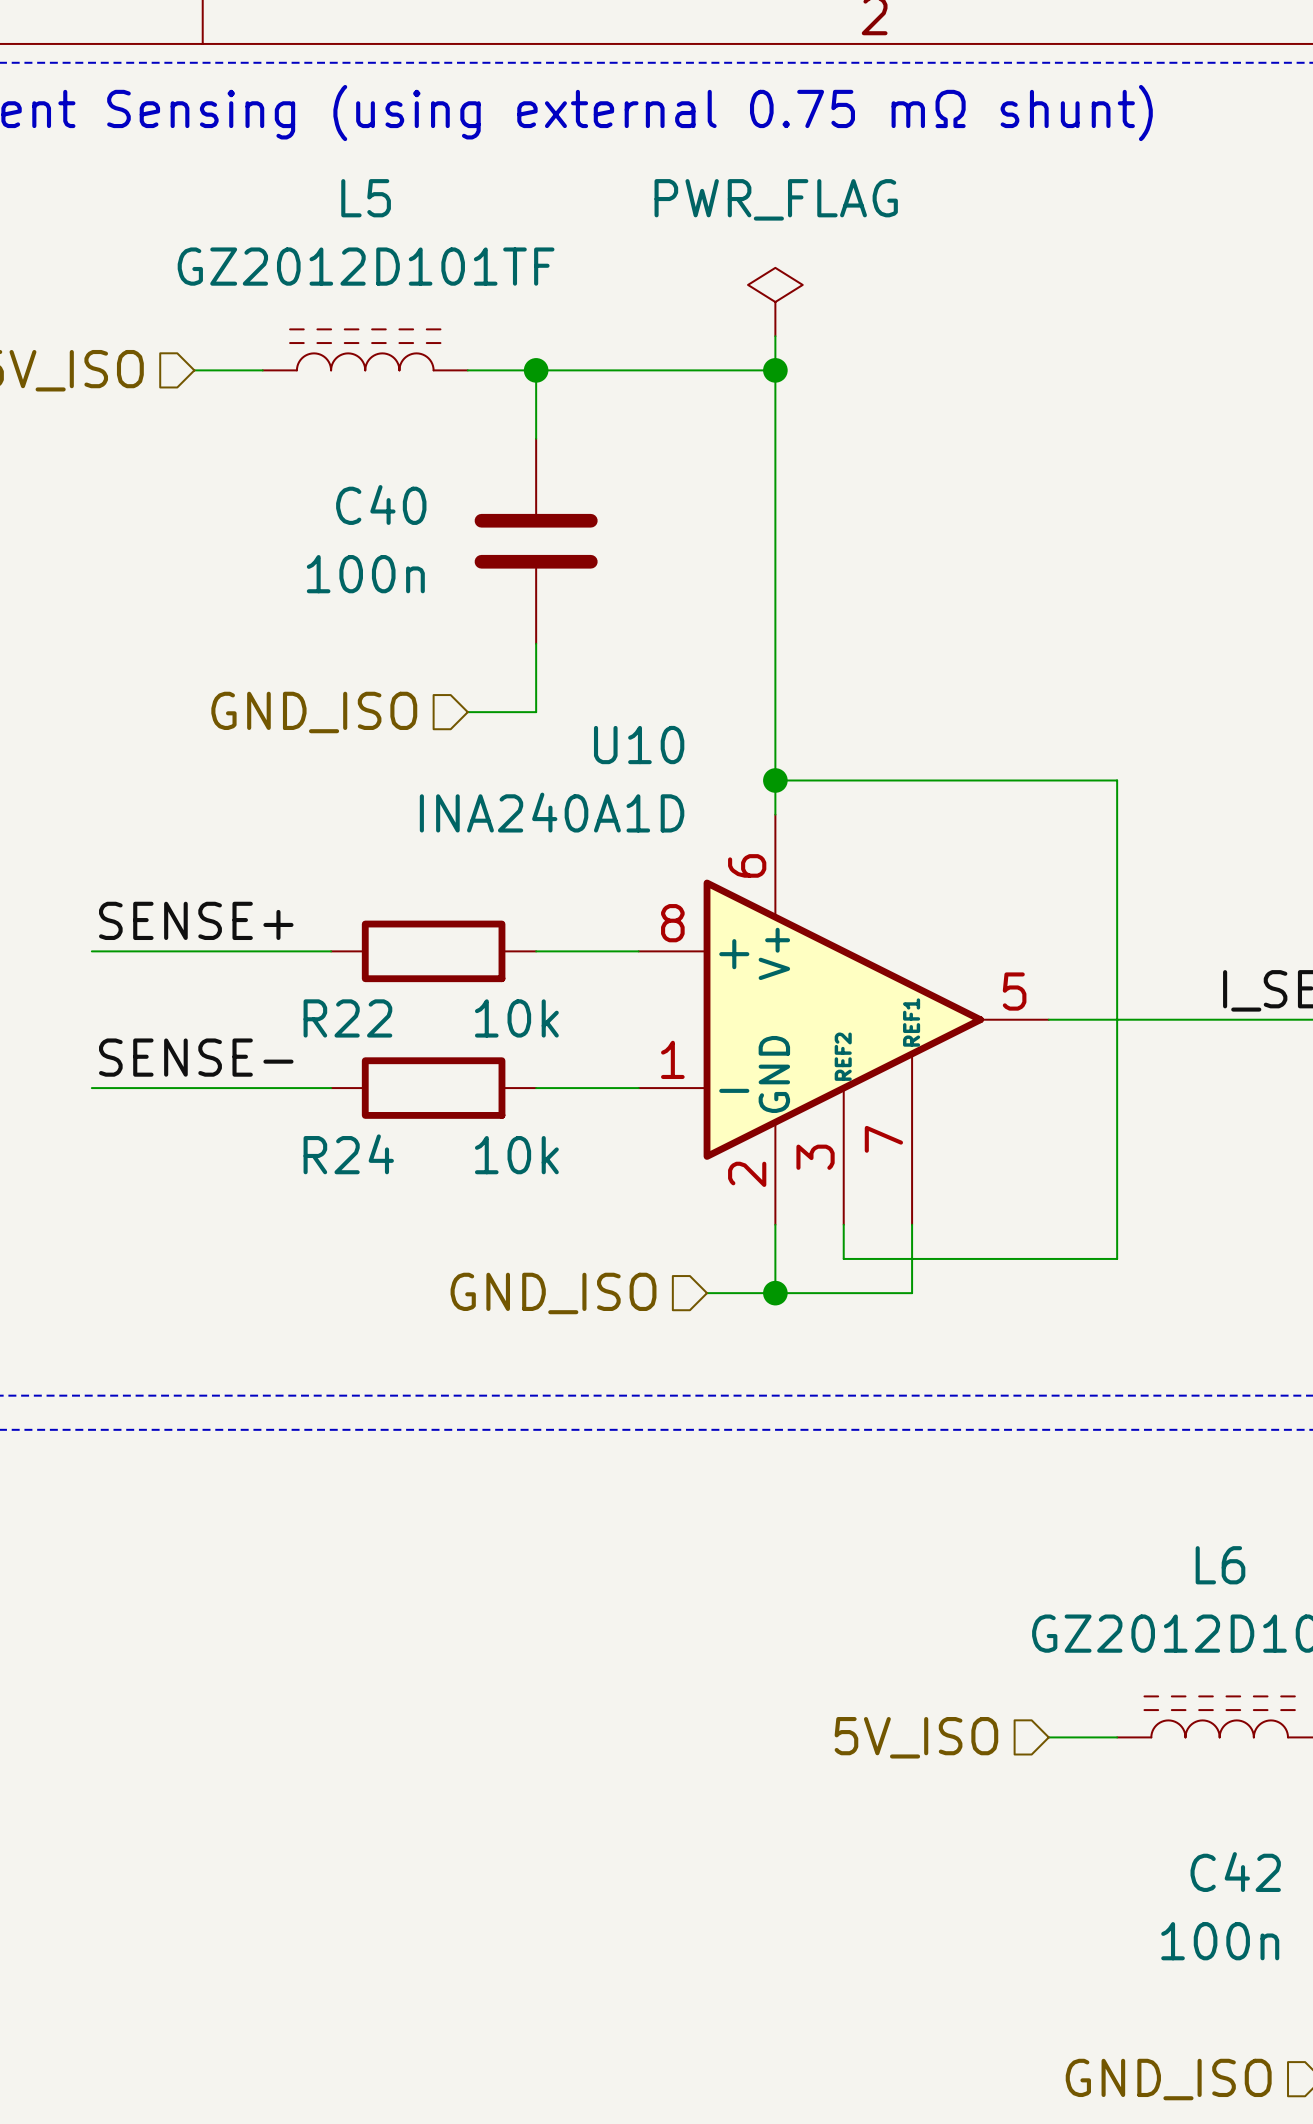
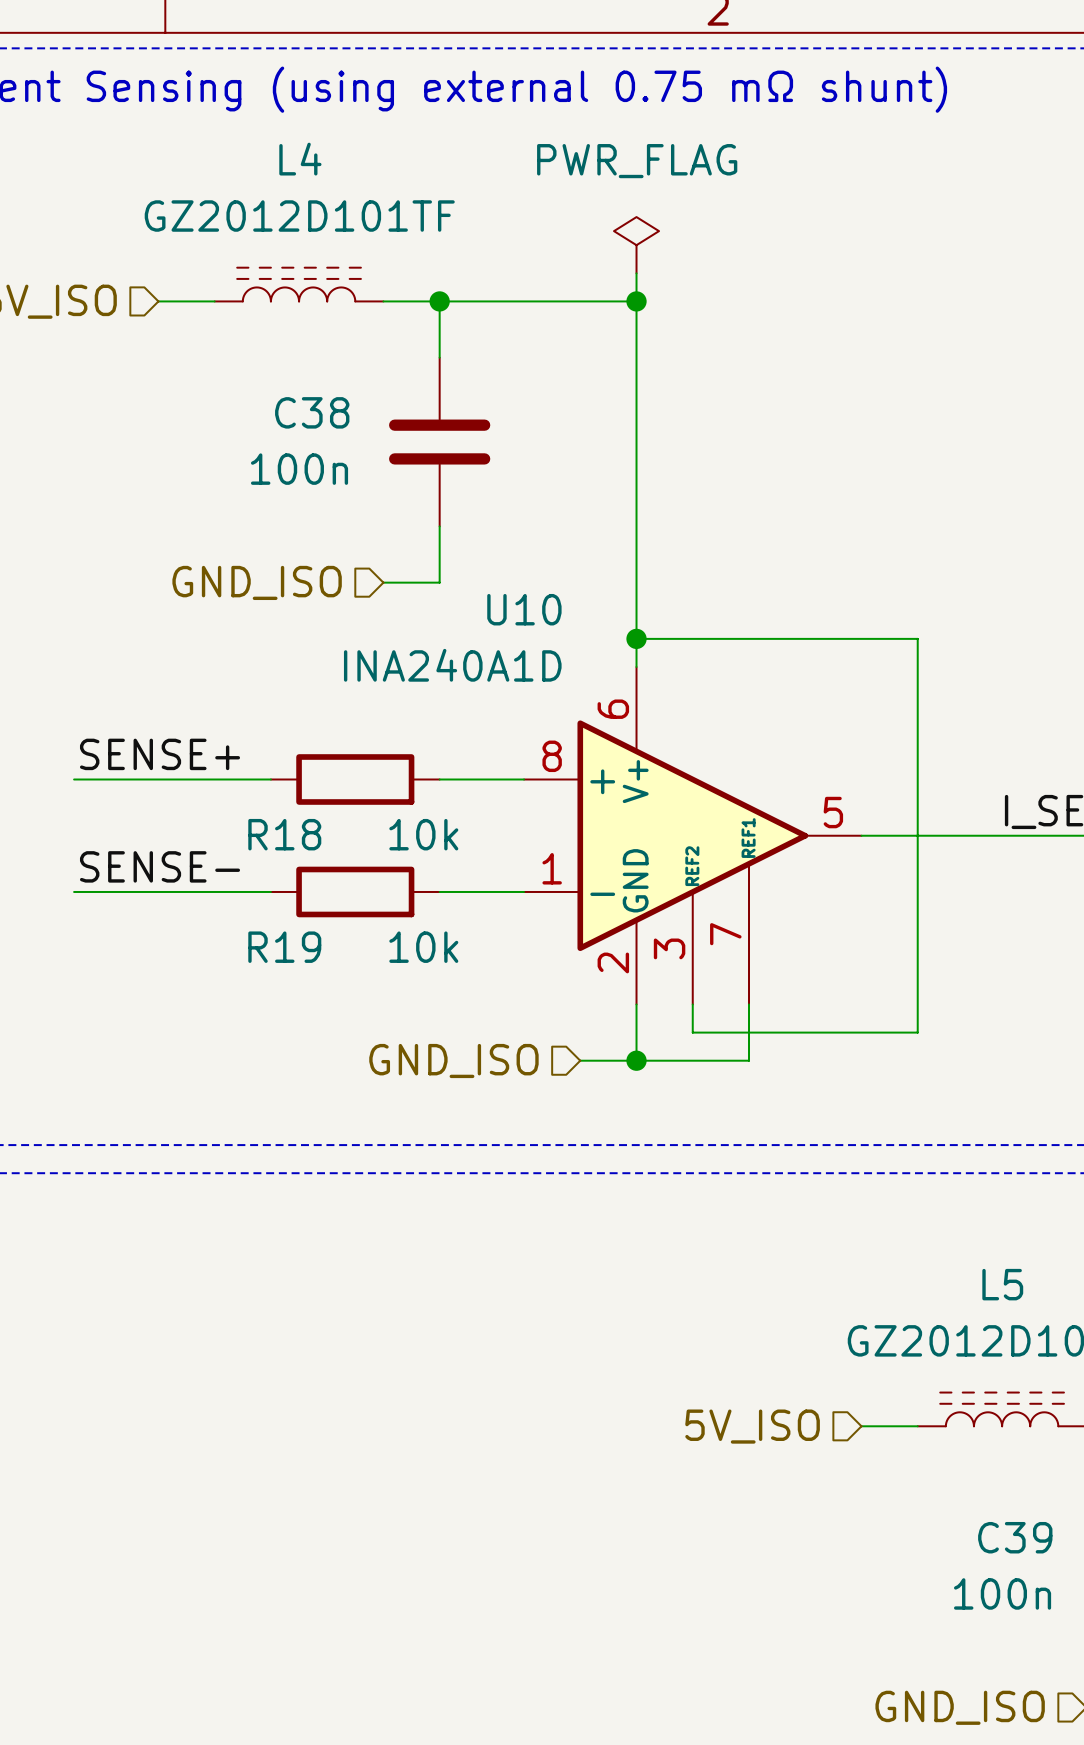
L5 name: L5 (366, 198) -> L4 (300, 159)
C40 name: C40 (381, 504) -> C38 (312, 412)
R22 name: R22 (347, 1018) -> R18 (284, 834)
R24 name: R24 (348, 1154) -> R19 (284, 947)
L6 name: L6 (1220, 1565) -> L5 (1002, 1284)
C42 name: C42 (1235, 1872) -> C39 (1015, 1537)

